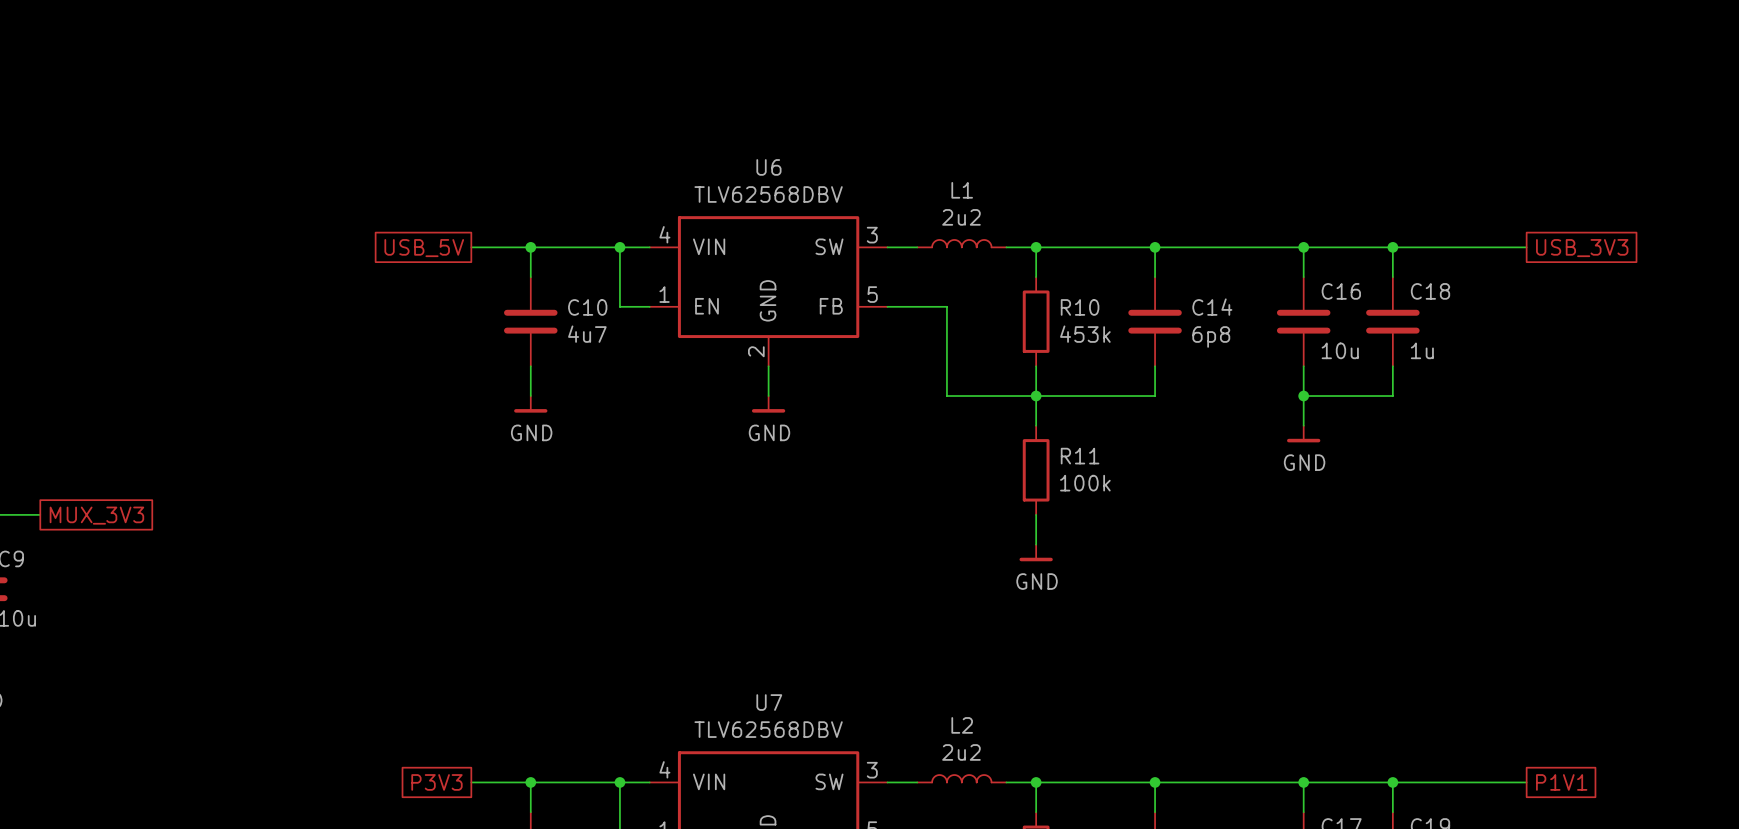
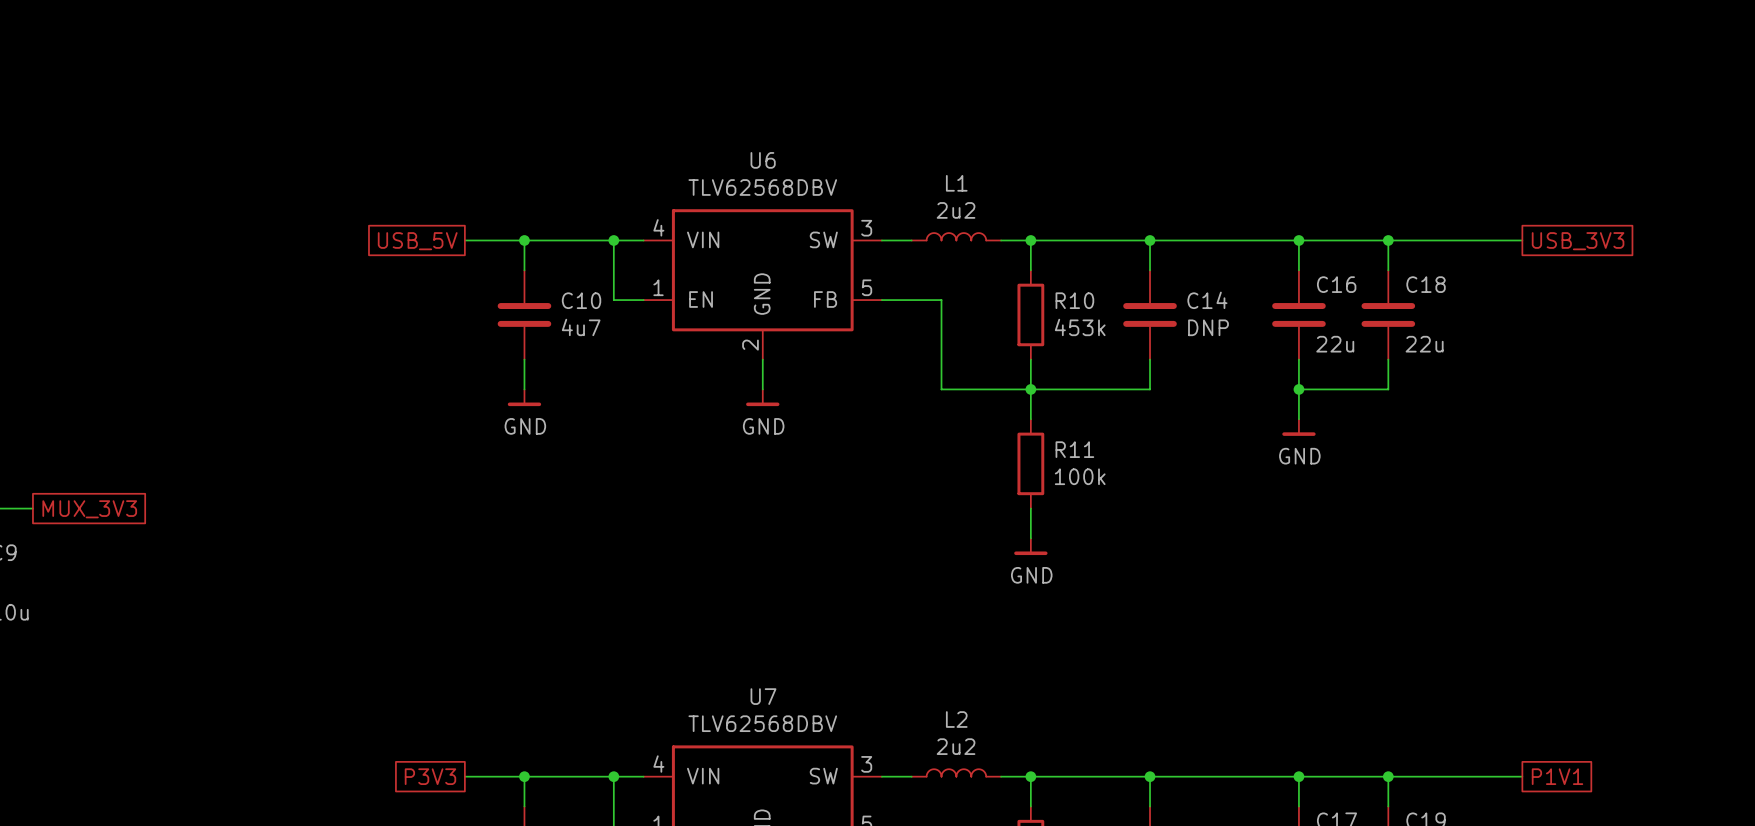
C14 value: 6p8 (1211, 336) -> DNP (1208, 327)
C16 value: 10u (1340, 350) -> 22u (1335, 344)
C18 value: 1u (1422, 350) -> 22u (1424, 344)

